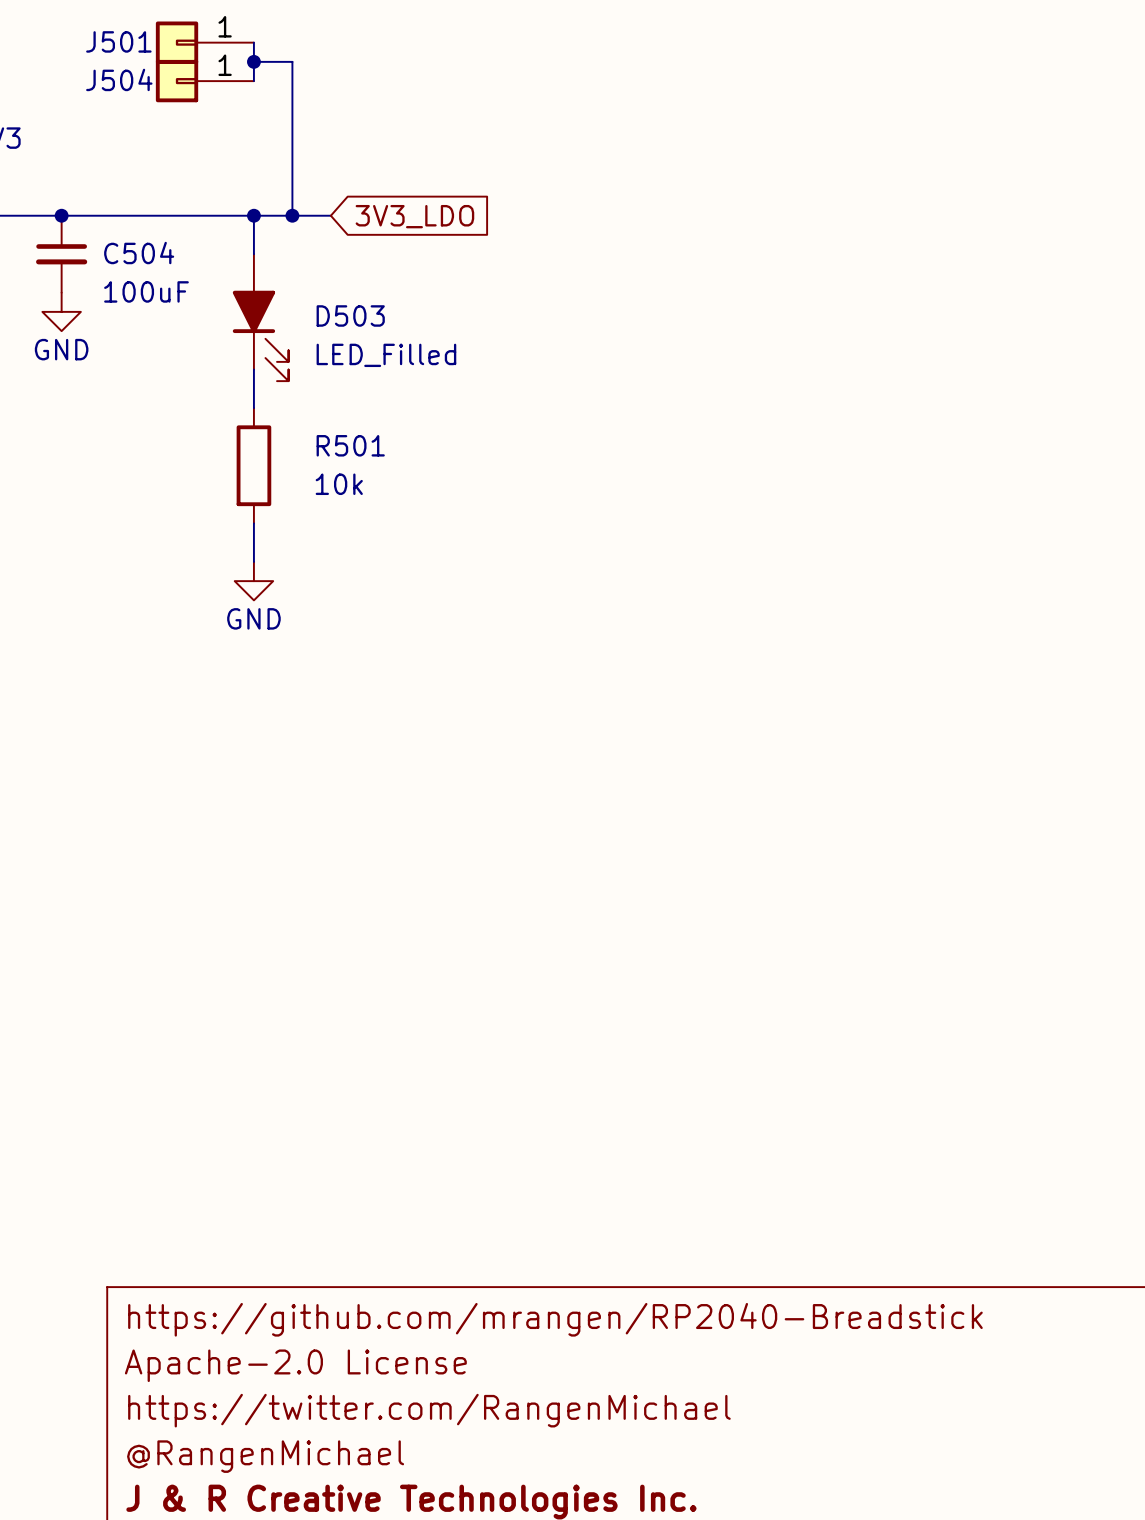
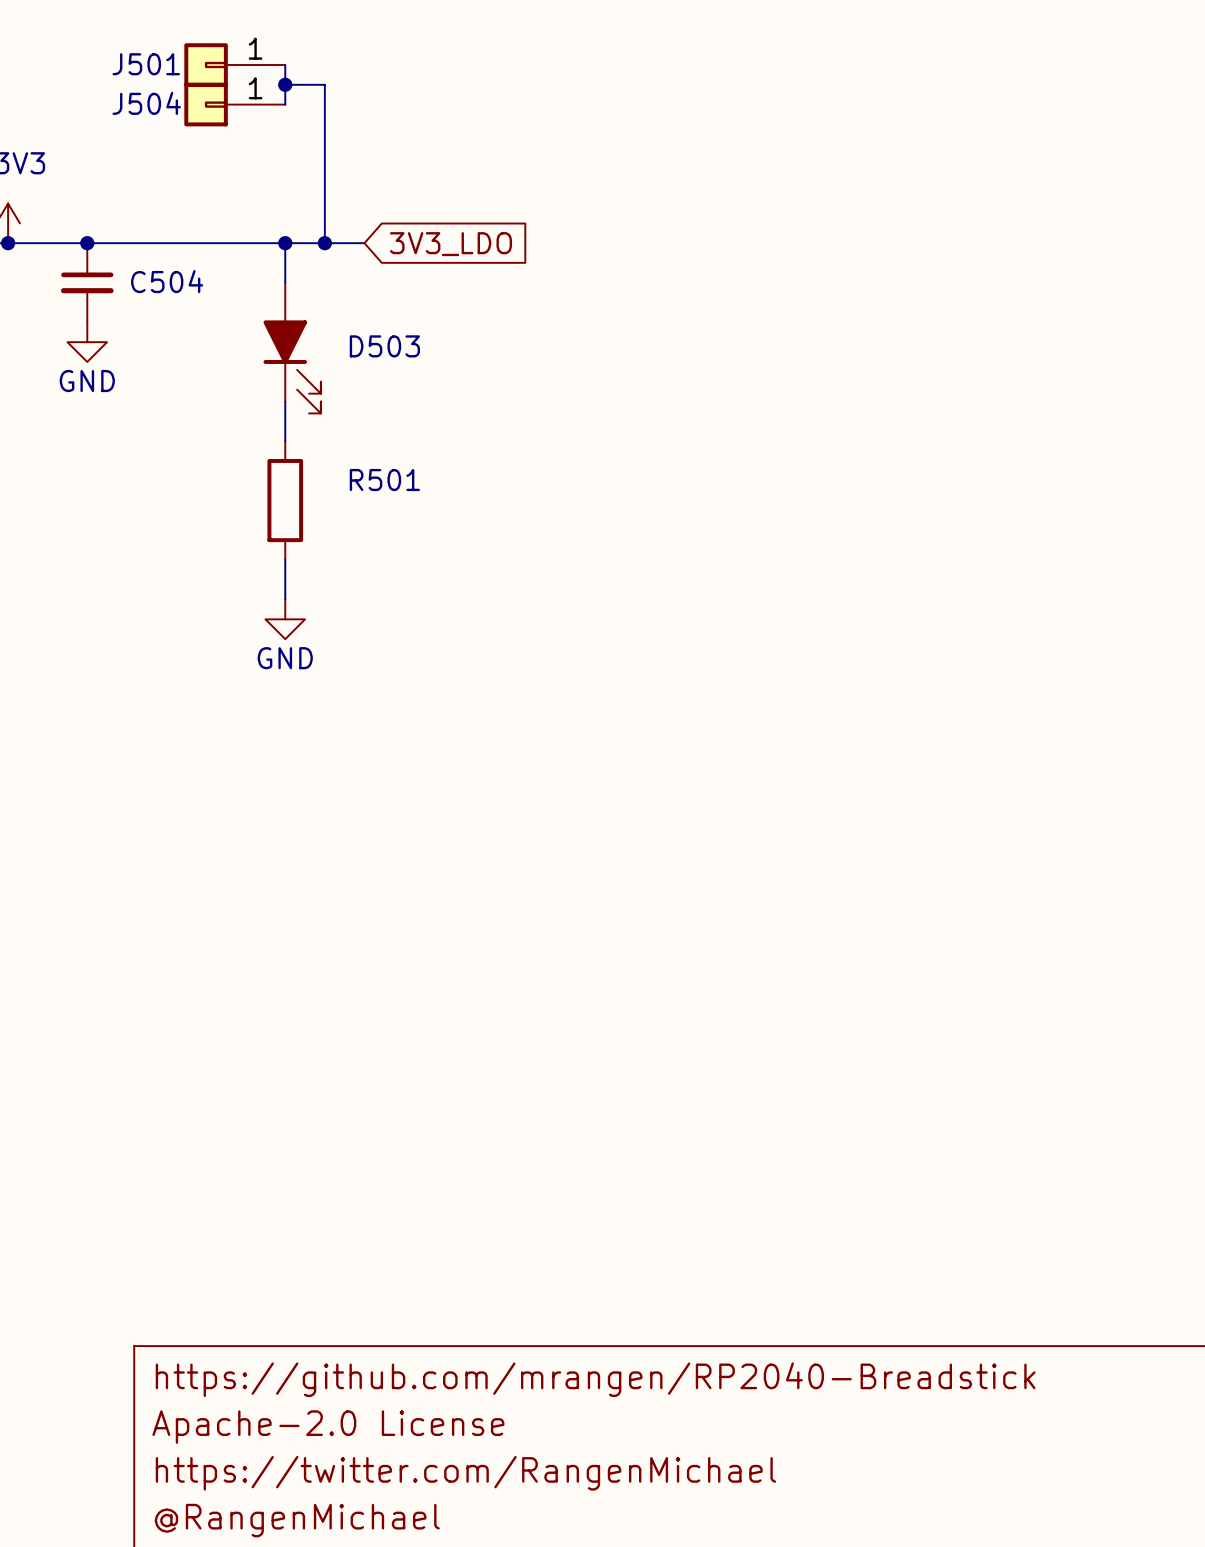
C504 value: 100uF (146, 291) -> none
D503 value: LED_Filled (386, 355) -> none
R501 value: 10k (339, 484) -> none

